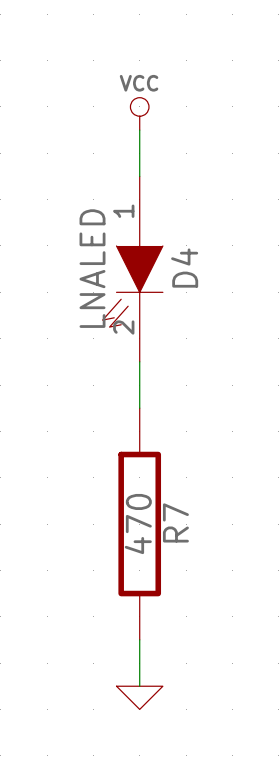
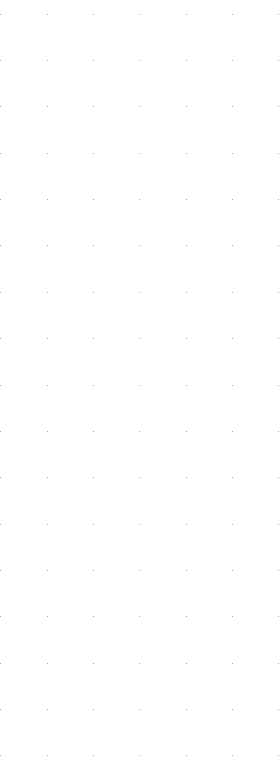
power symbol: VCC (139, 113) -> none
wire: (139, 130) (139, 176) -> none
D4: LNALED (132, 269) -> none
wire: (139, 361) (139, 408) -> none
R7: 470 (139, 524) -> none
wire: (139, 639) (139, 686) -> none
power symbol: (139, 697) -> none

